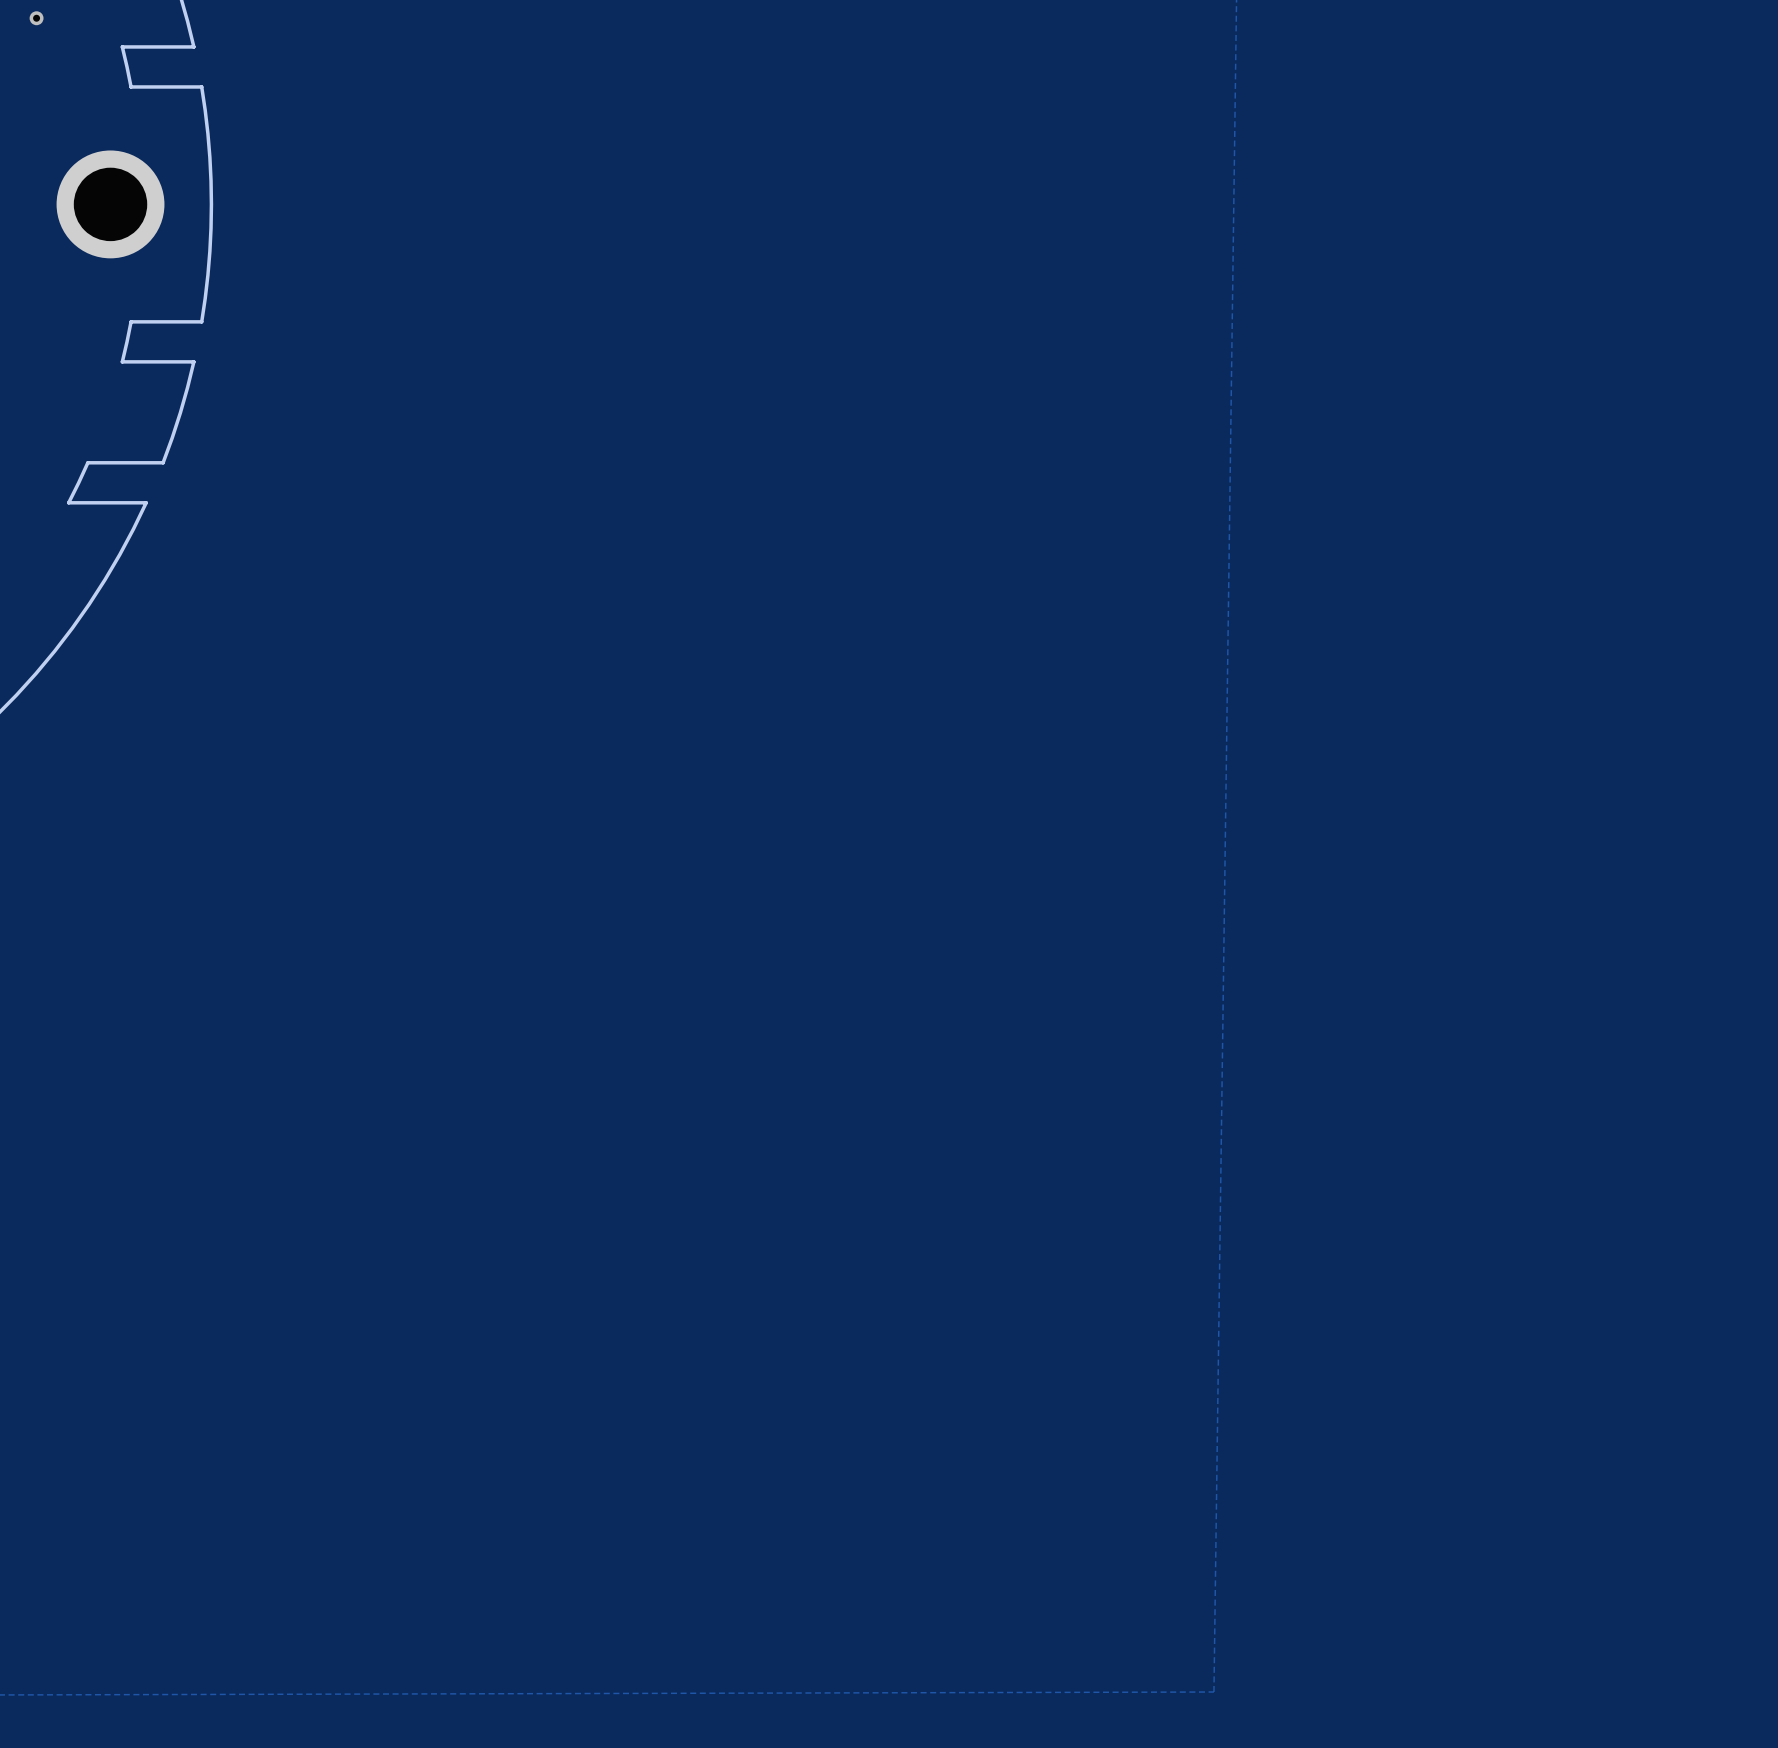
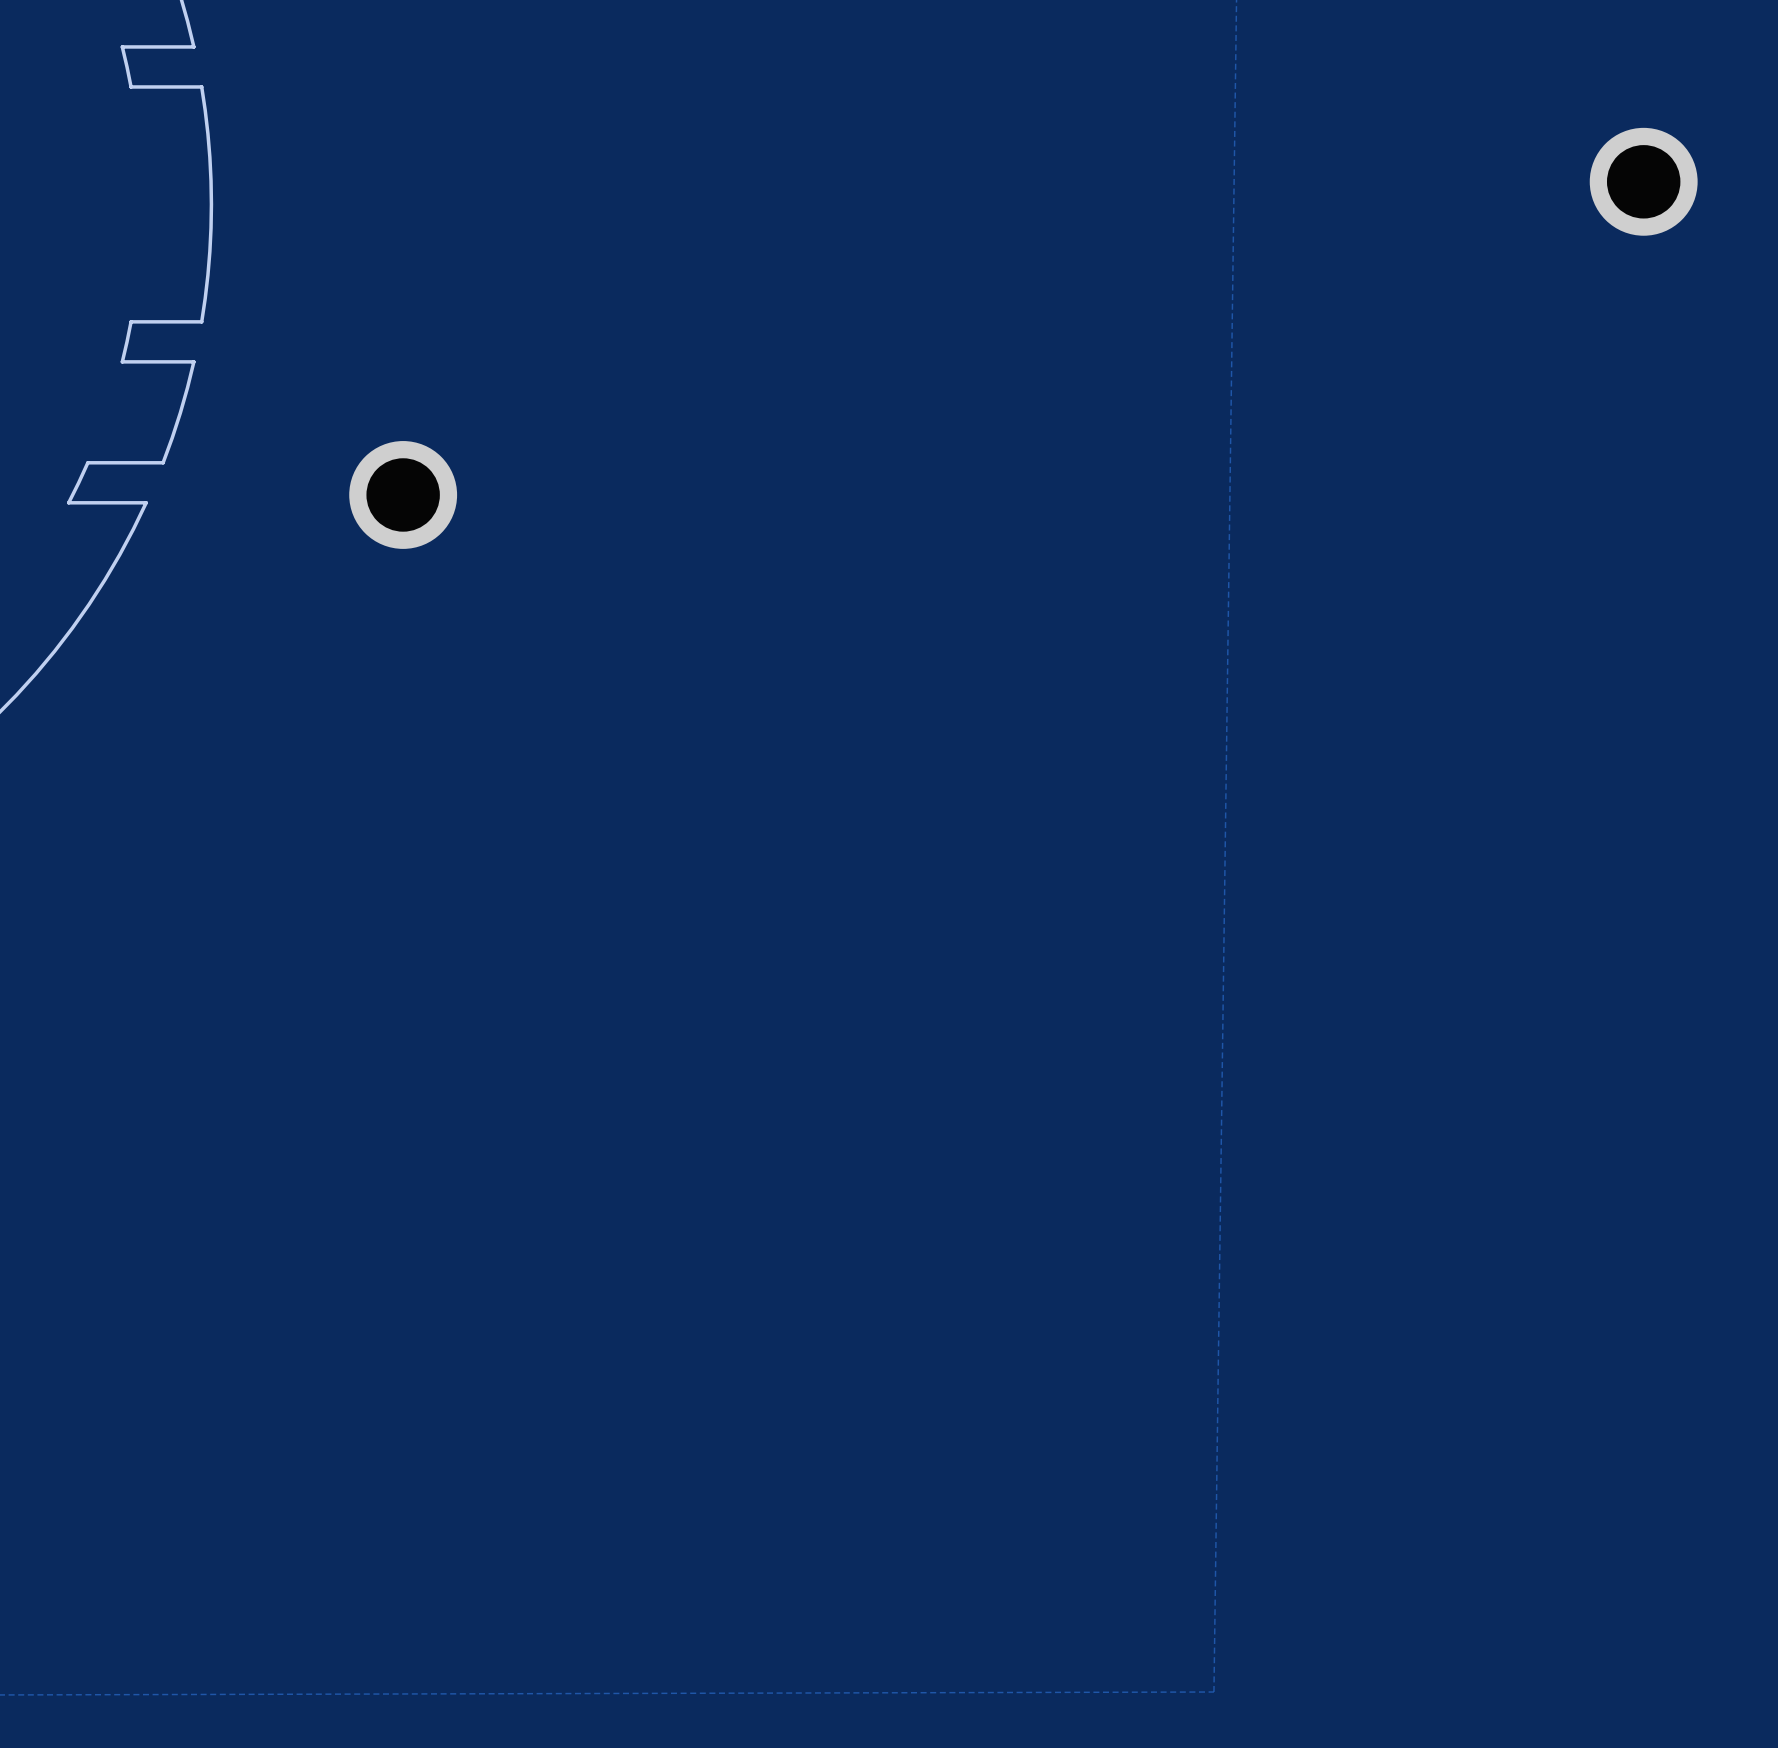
via: (36, 18) -> none
part: none -> (1643, 181)
part position: (110, 204) -> (403, 494)

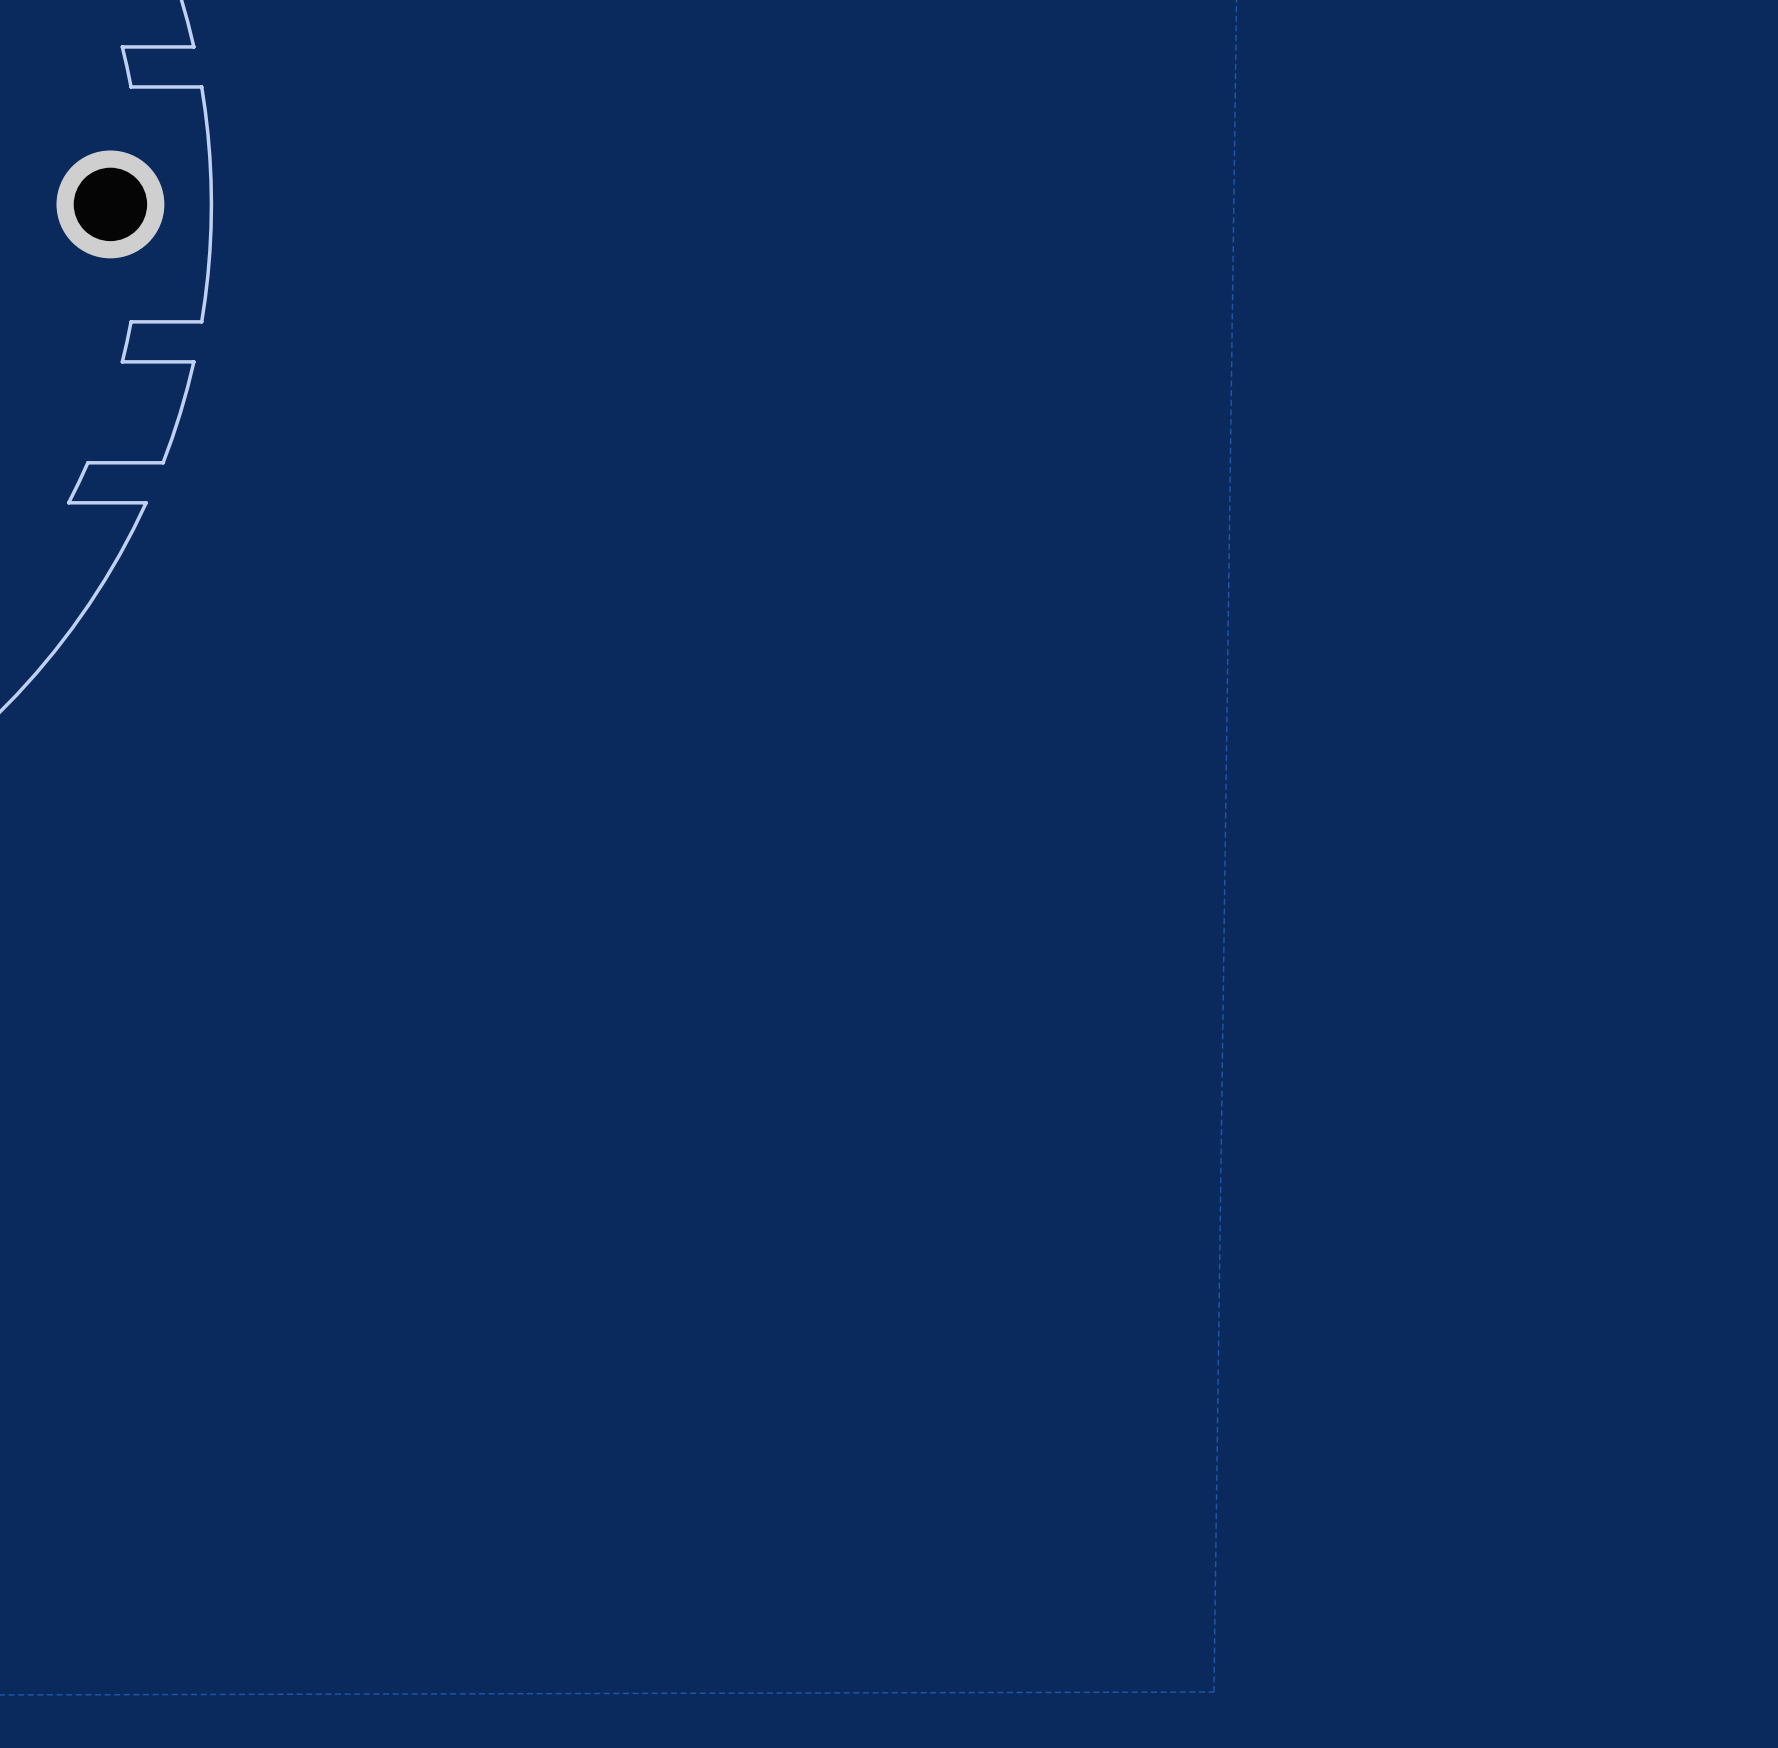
part: (1643, 181) -> none
part position: (403, 494) -> (110, 204)

